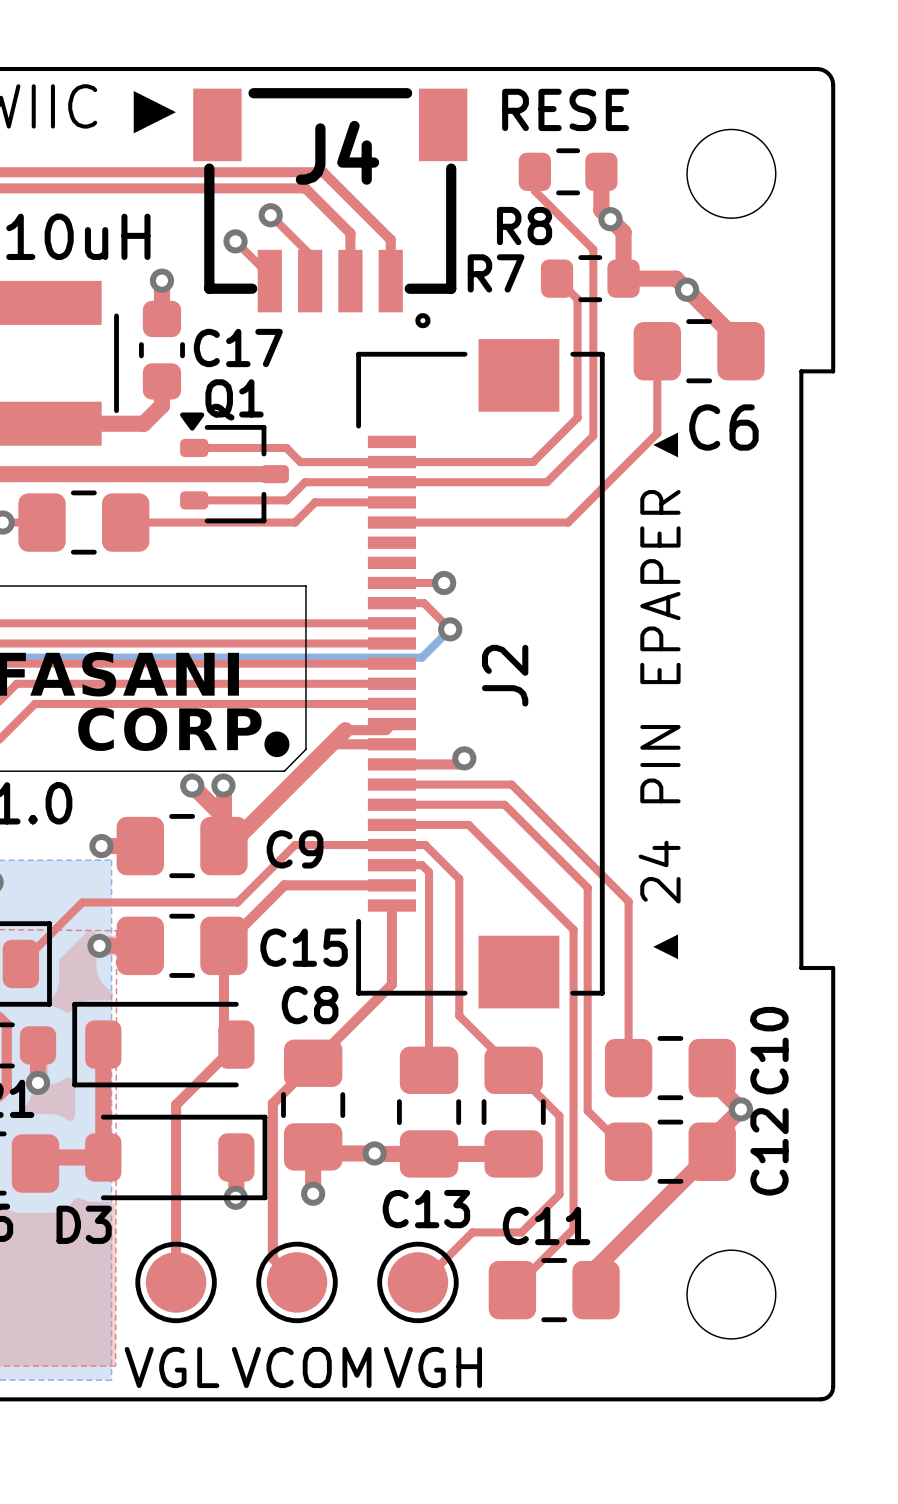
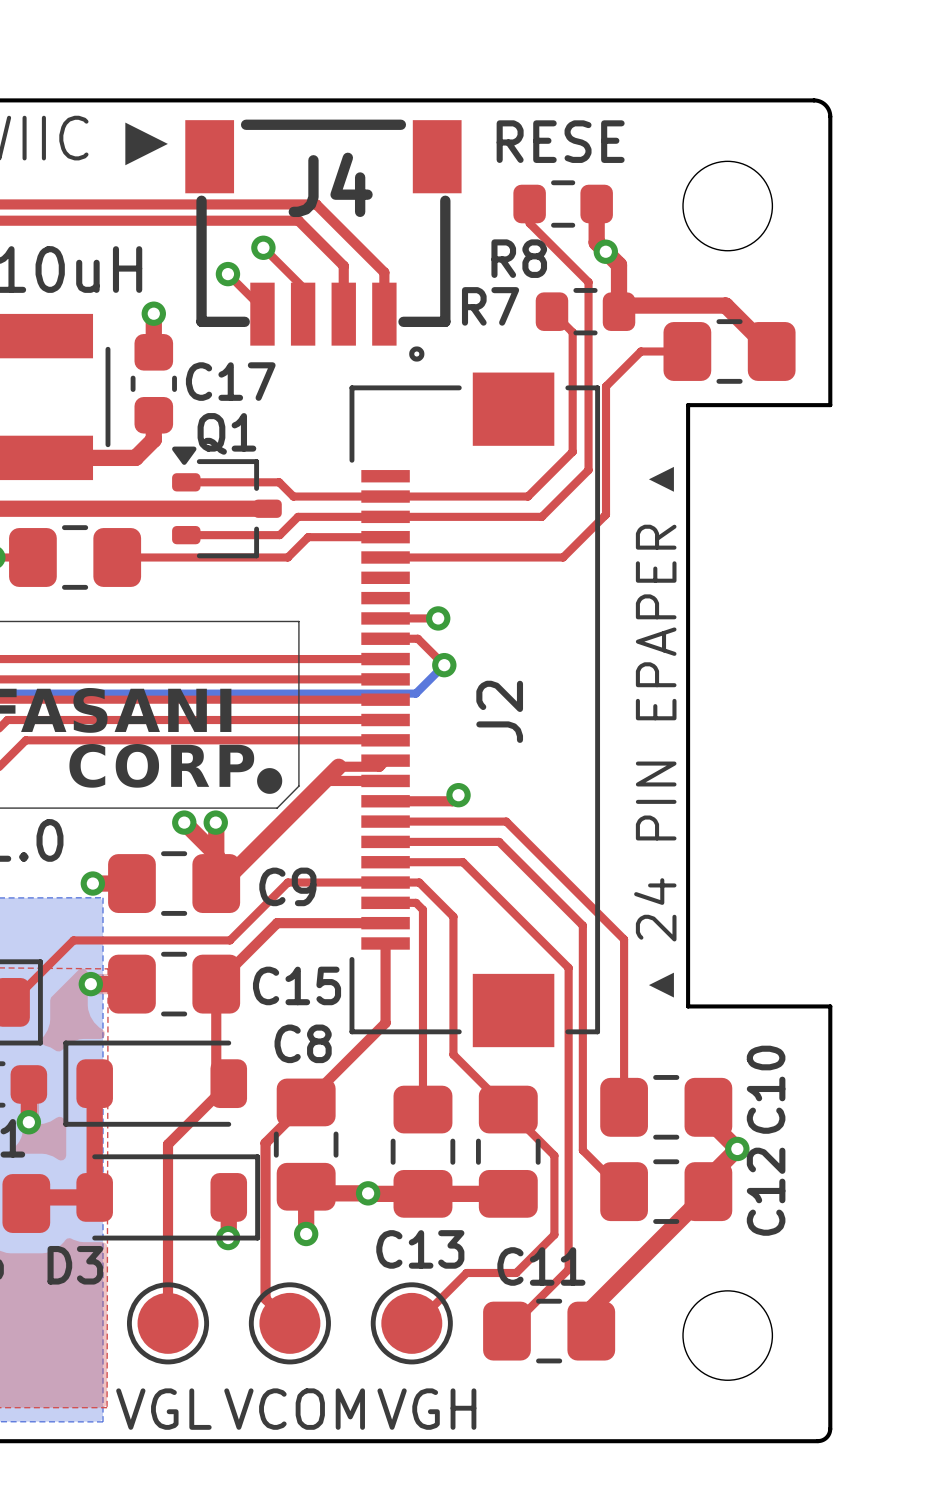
top track: (623, 278) (675, 278) (740, 343) (740, 351) -> (619, 311) (625, 305) (725, 305) (771, 351)
via: (687, 289) -> none
part: none -> (729, 351)
top track: (657, 351) (657, 433) (610, 480) -> (687, 351) (640, 351) (606, 386) (606, 514)
C6: (699, 351) -> none
board edge: (801, 371) (801, 968) -> (798, 405) (688, 405) (688, 1006) (798, 1006)

